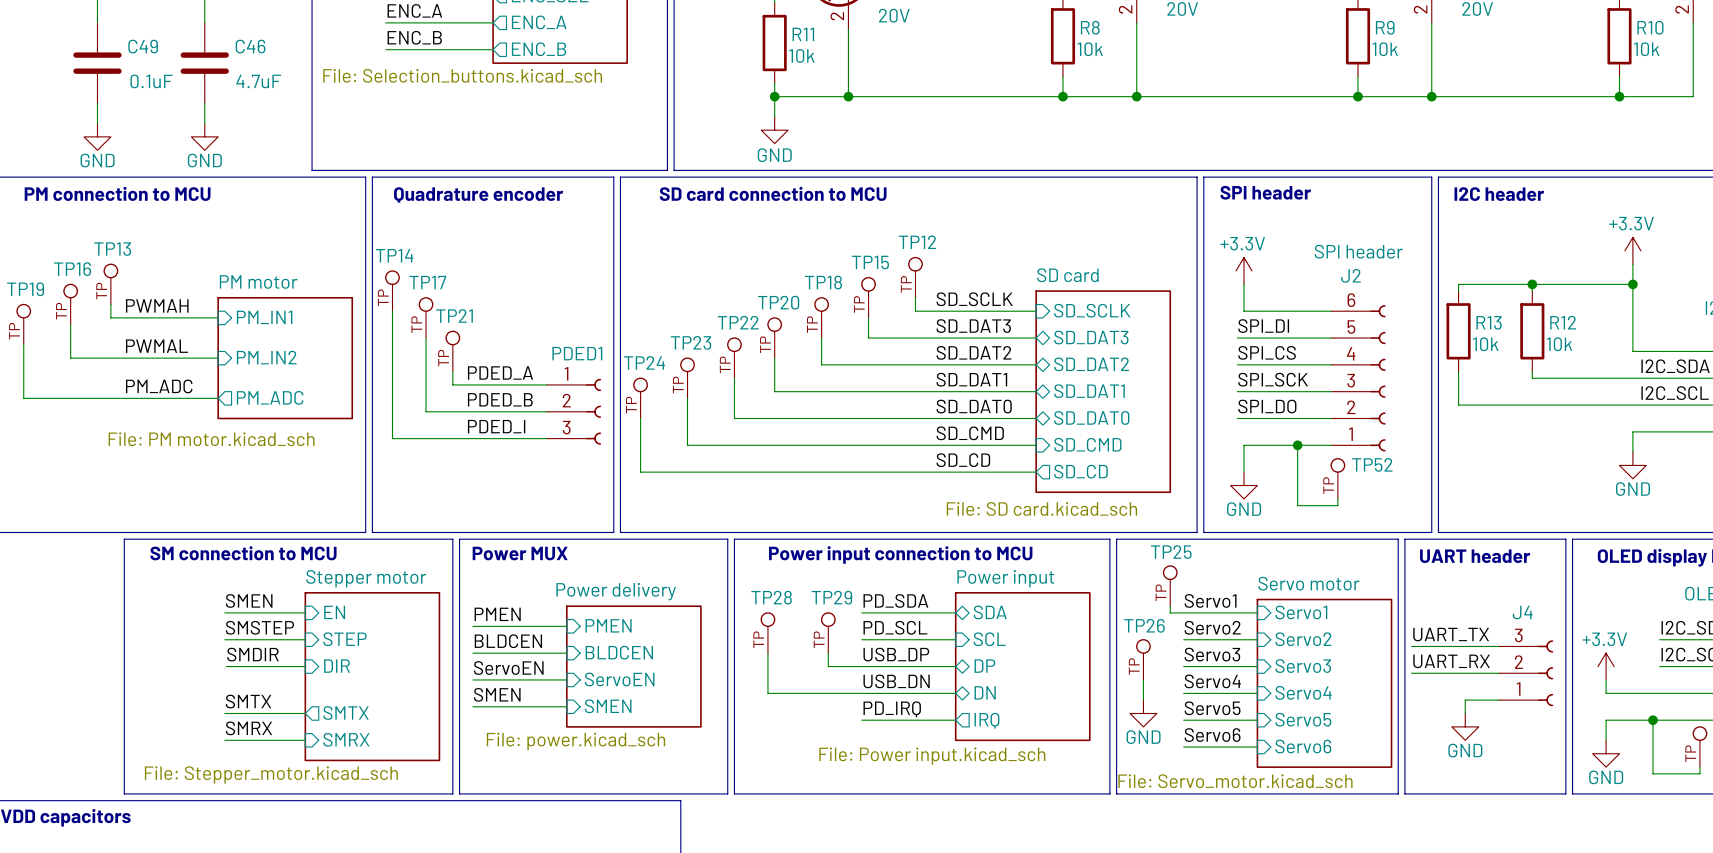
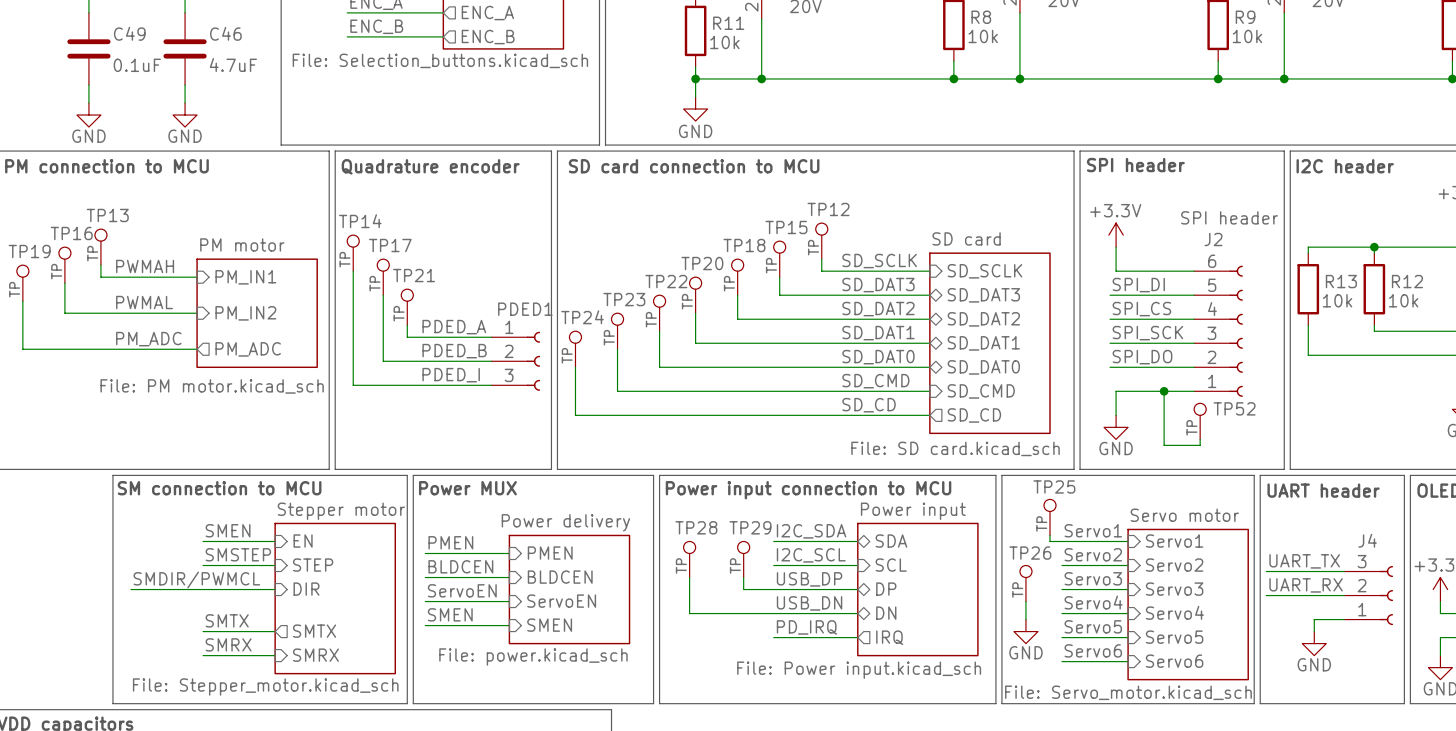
label: PD_SDA (895, 600) -> I2C_SDA (811, 531)
label: PD_SCL (895, 627) -> I2C_SCL (811, 555)
label: SMDIR (252, 654) -> SMDIR/PWMCL (196, 579)
wire: none -> (130, 589) (204, 589)

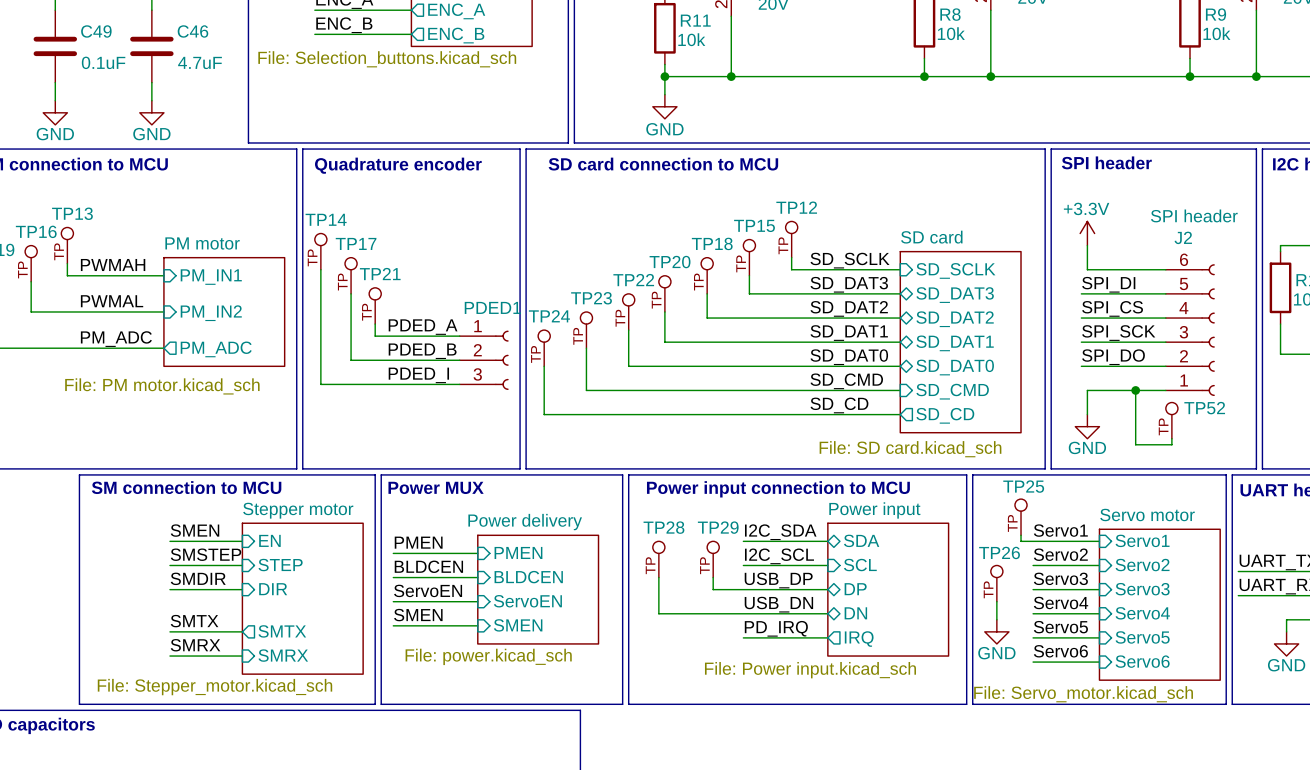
label: SMDIR/PWMCL (196, 579) -> SMDIR (198, 578)
wire: (130, 589) (203, 589) -> none

